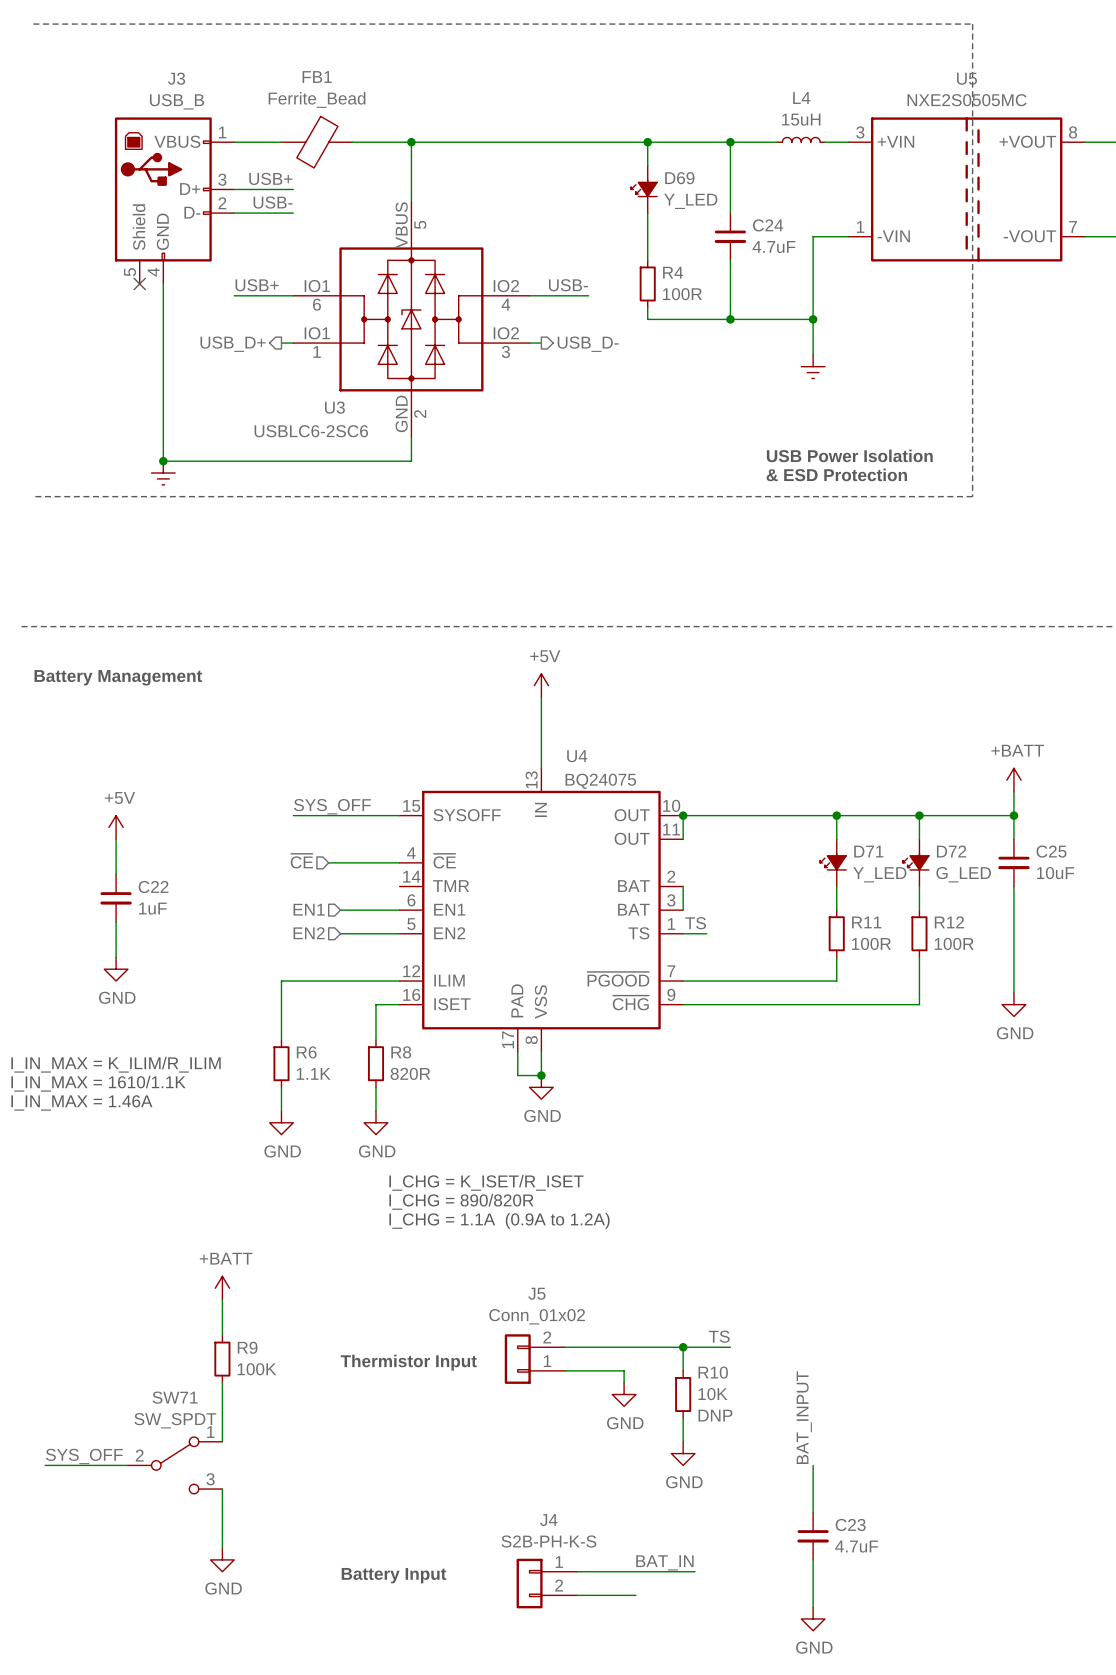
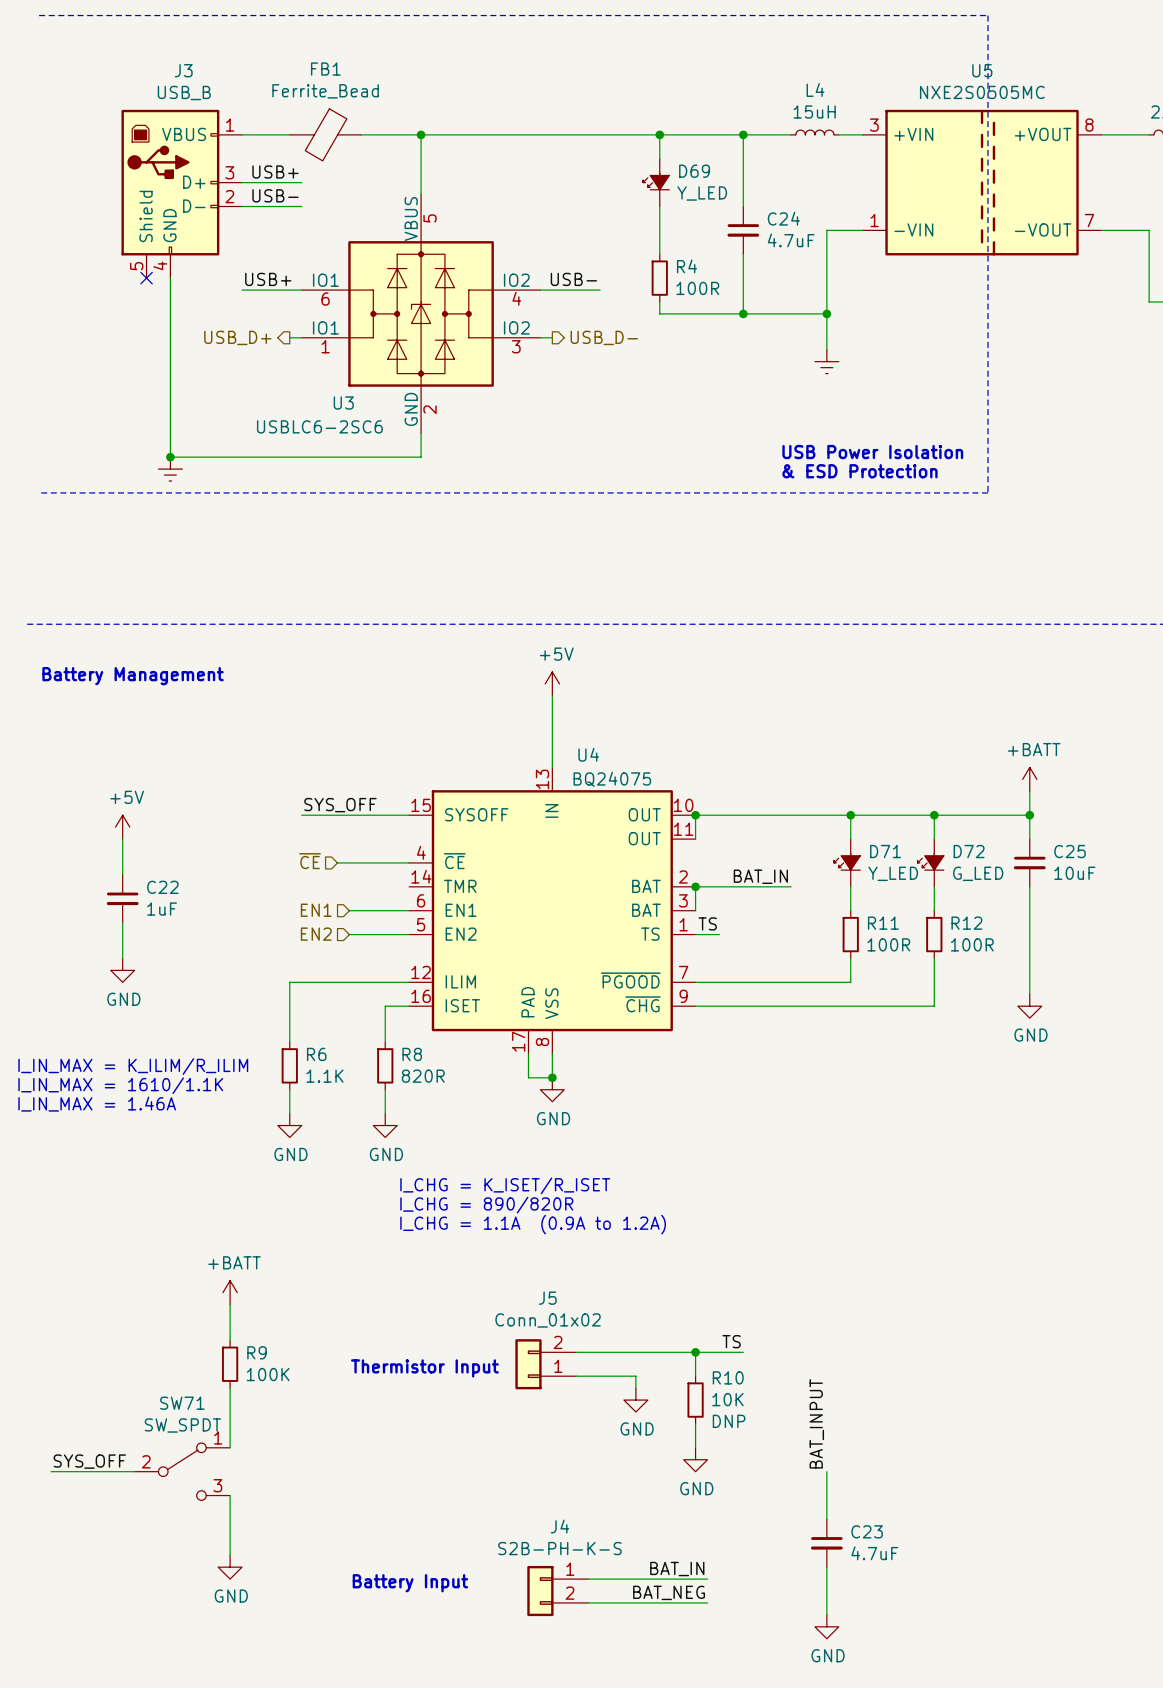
label: none -> BAT_IN (760, 876)
wire: none -> (695, 886) (791, 886)
junction: none -> (695, 886)
label: none -> BAT_NEG (669, 1592)
wire: none -> (647, 1602) (707, 1602)

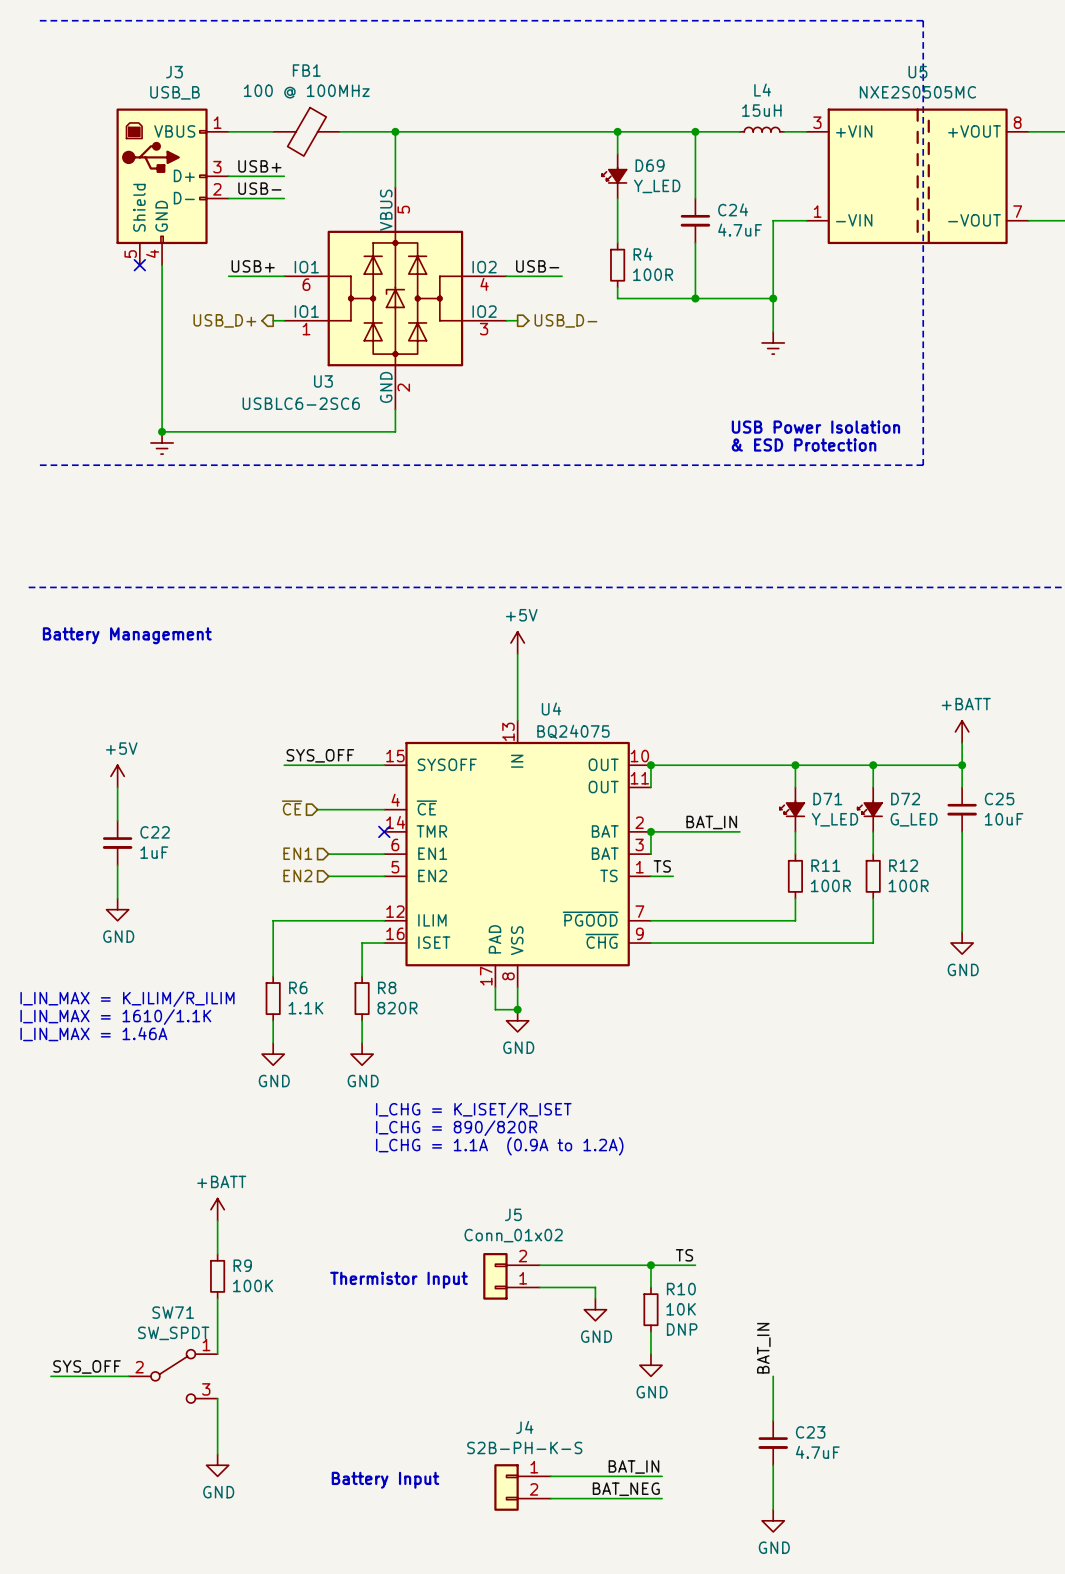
FB1 value: Ferrite_Bead (325, 91) -> 100 @ 100MHz (306, 91)
no-connect mark: none -> (384, 831)
label: BAT_INPUT (816, 1423) -> BAT_IN (763, 1348)

